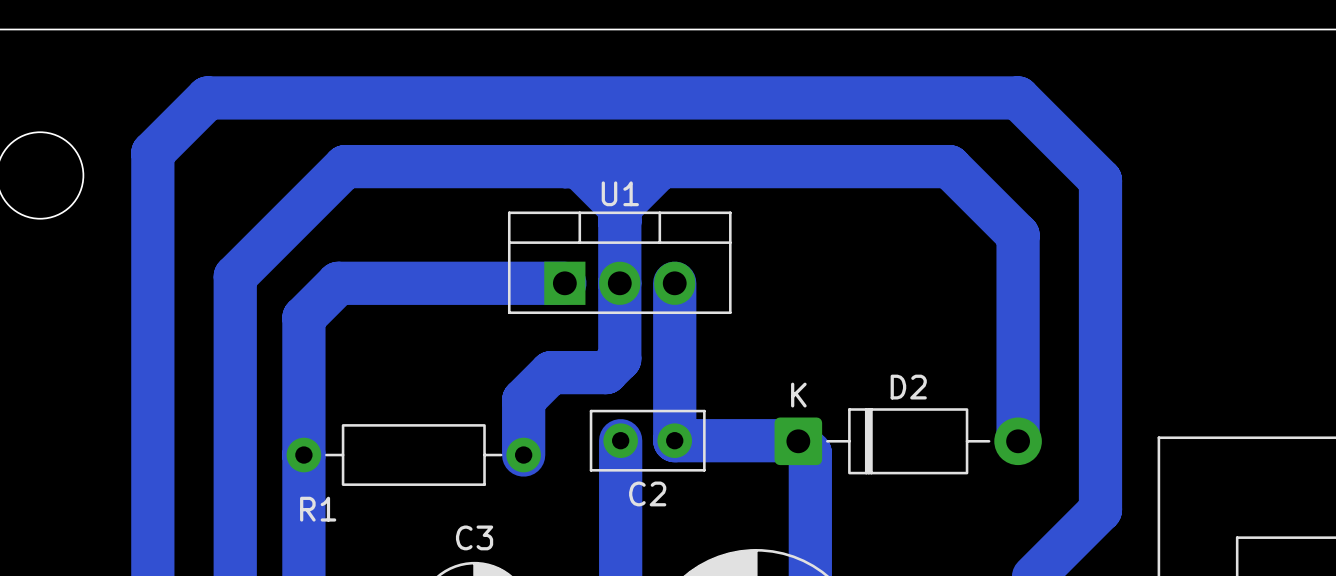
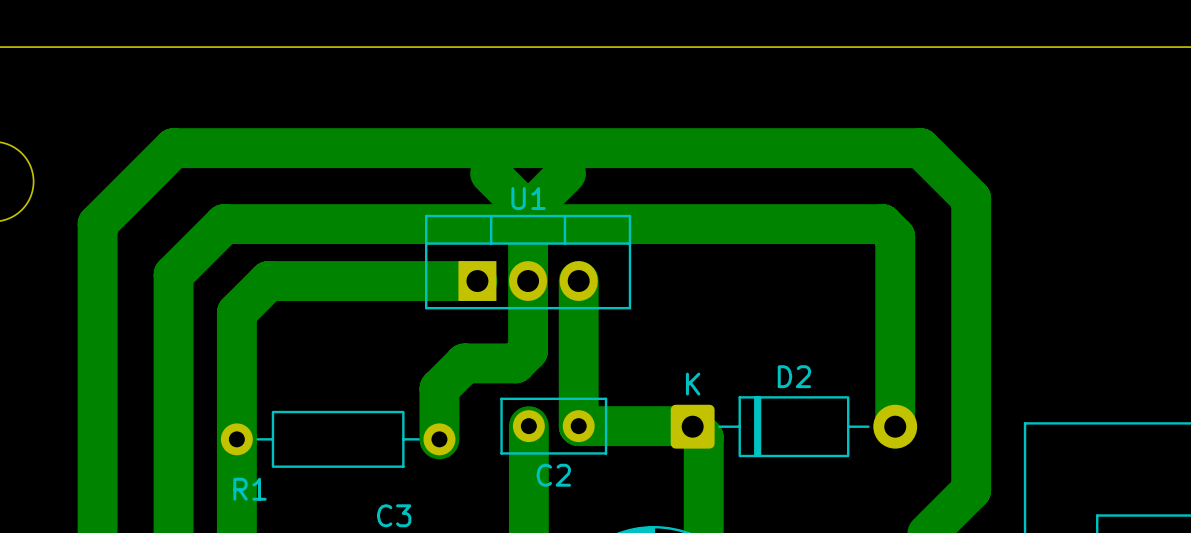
bottom track: (1100, 194) (1100, 180) (1018, 97) (207, 97) (152, 152) (152, 221) -> (971, 198) (920, 148) (173, 148) (97, 224)
bottom track: (290, 221) (345, 166) (949, 166) (1004, 221) -> (224, 224) (882, 224)

